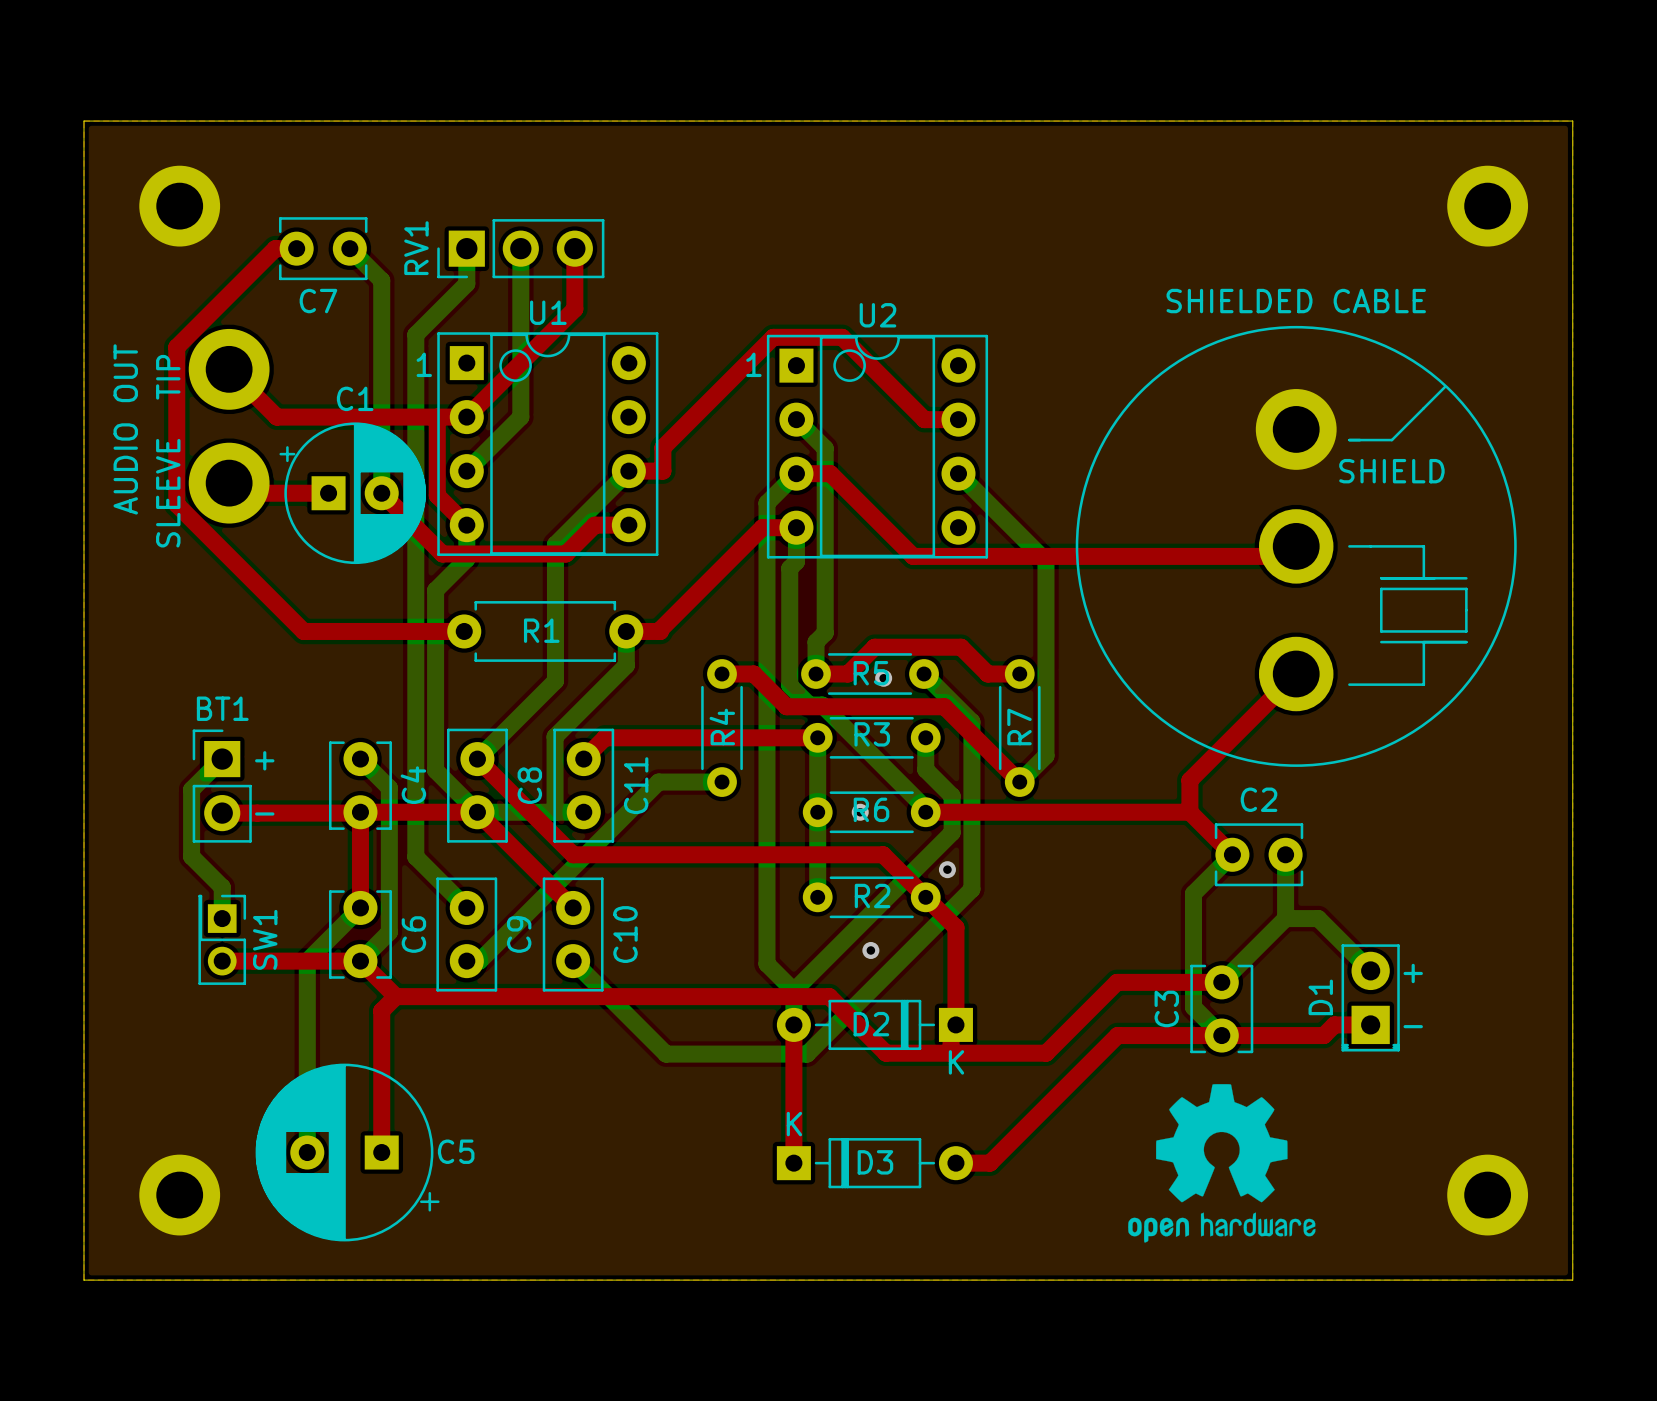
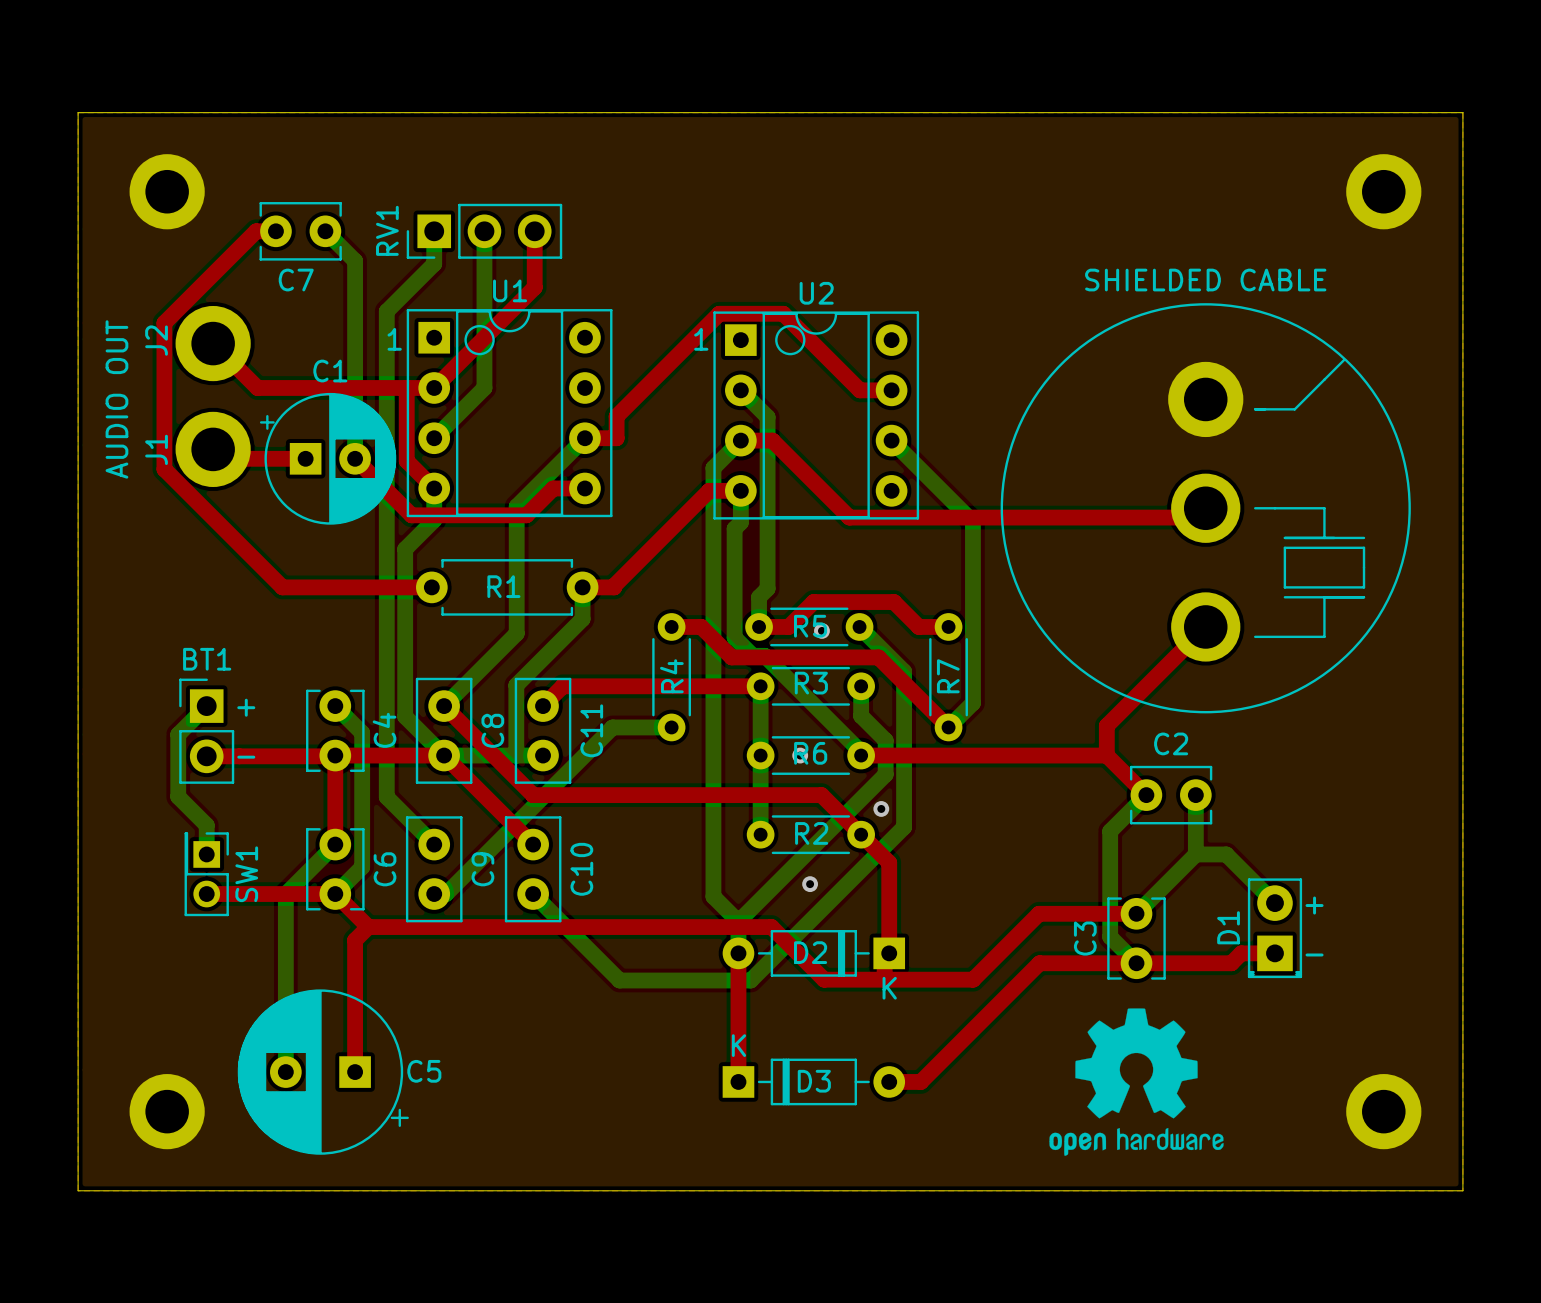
J2 name: none -> J2 (156, 340)
text: TIP (168, 377) -> none
text: SHIELD (1391, 471) -> none
J1 name: none -> J1 (156, 449)
text: SLEEVE (168, 493) -> none

